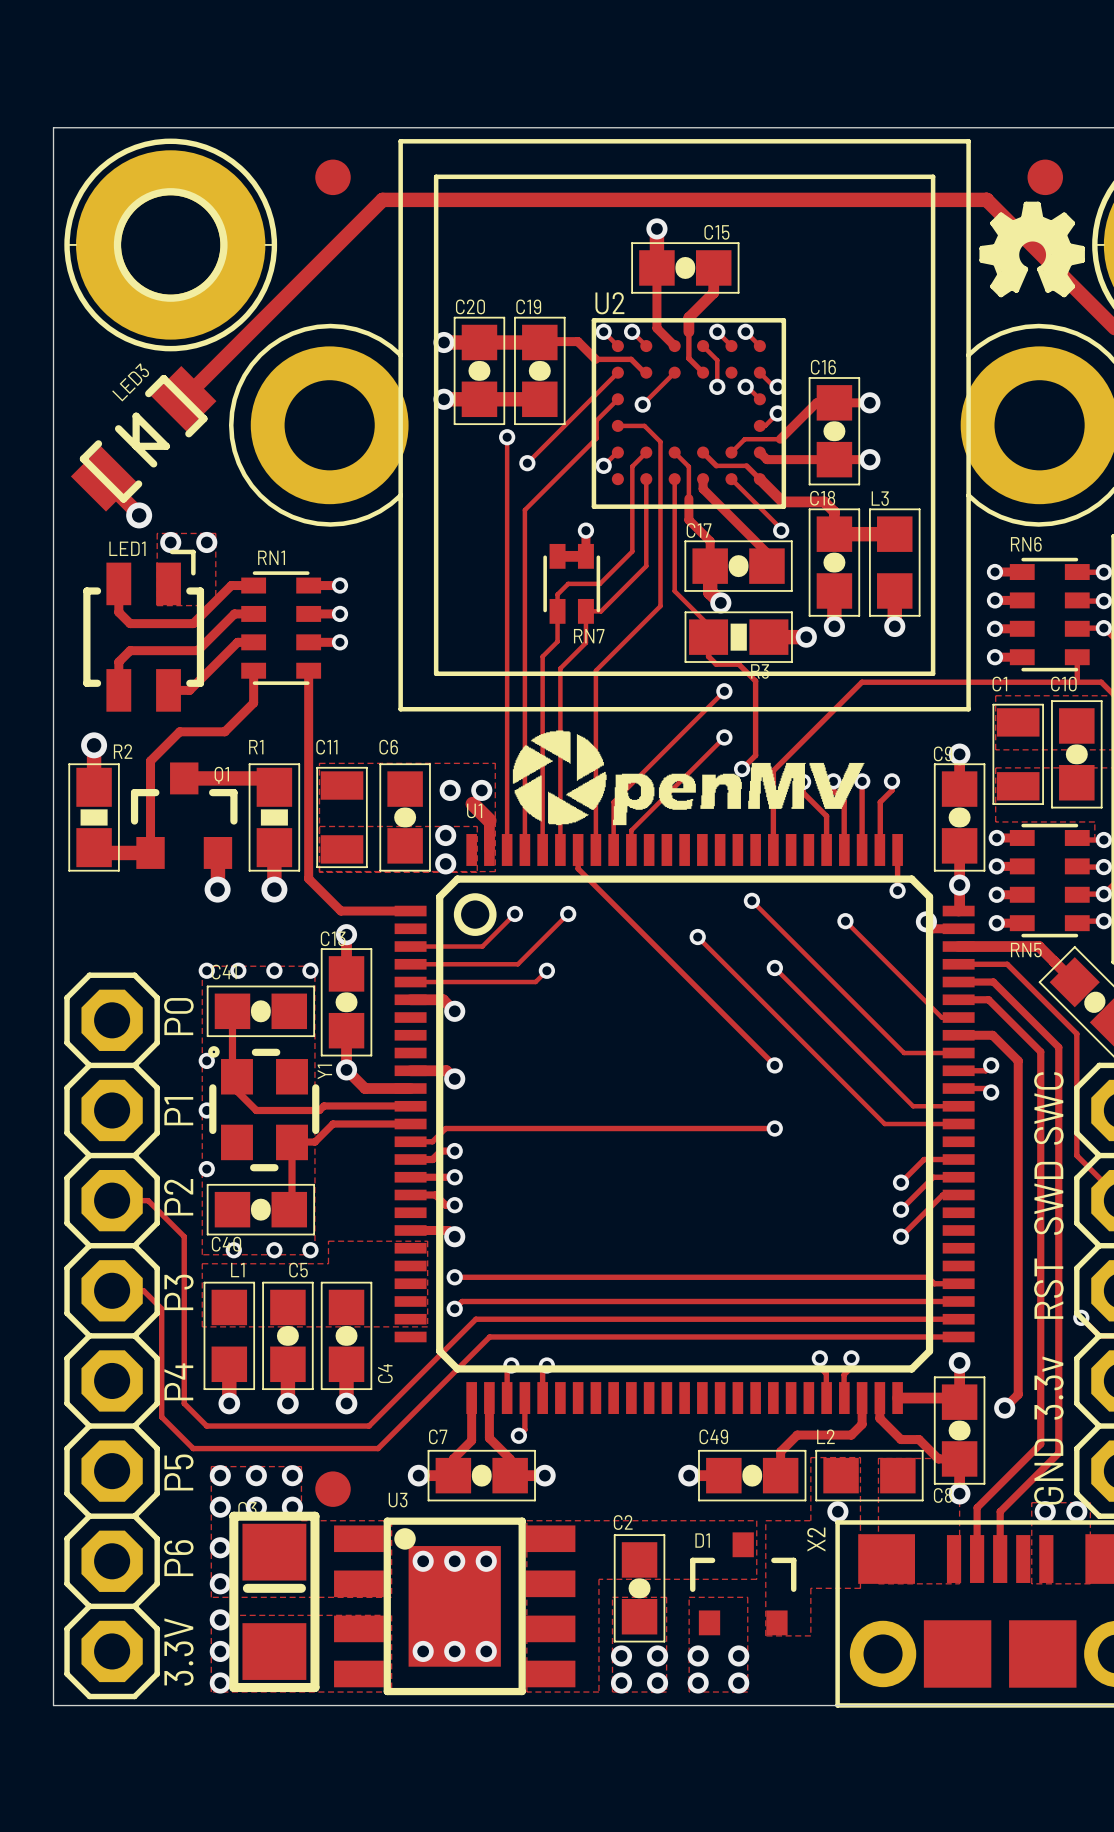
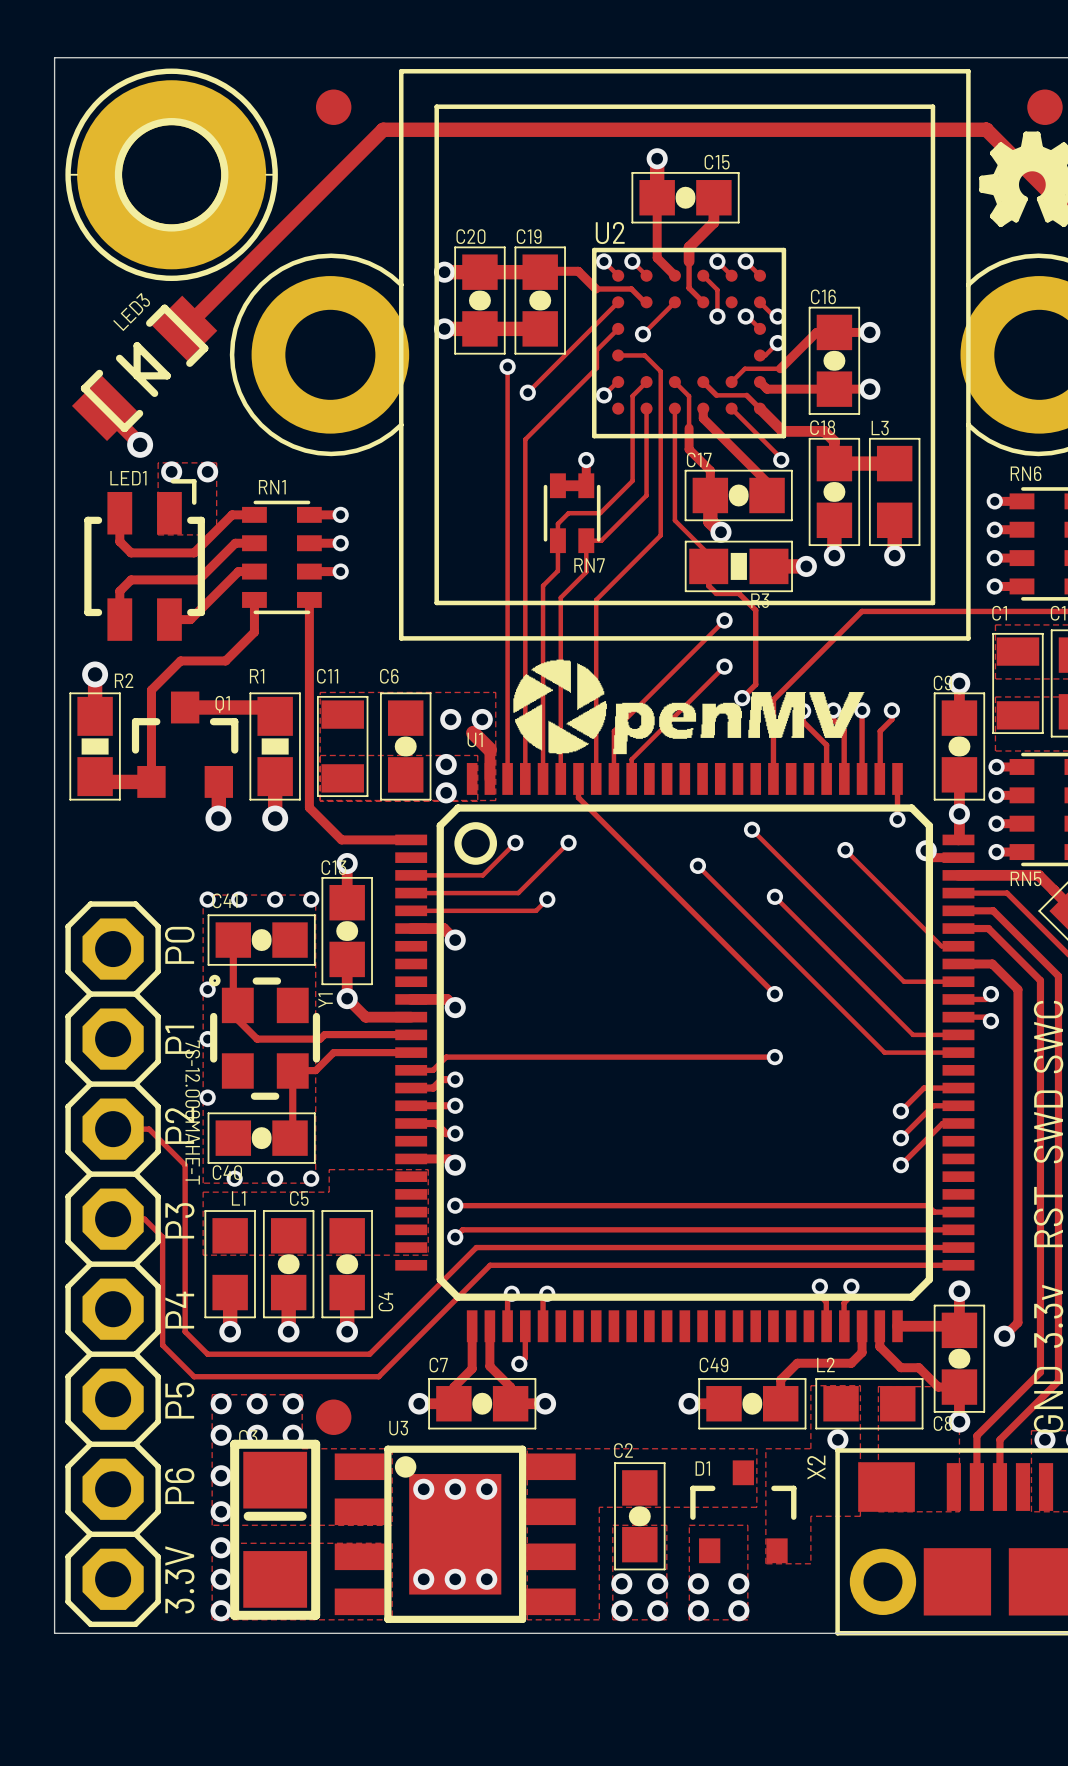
Y1 value: none -> 7S-12.000MAHE-T (192, 1112)

